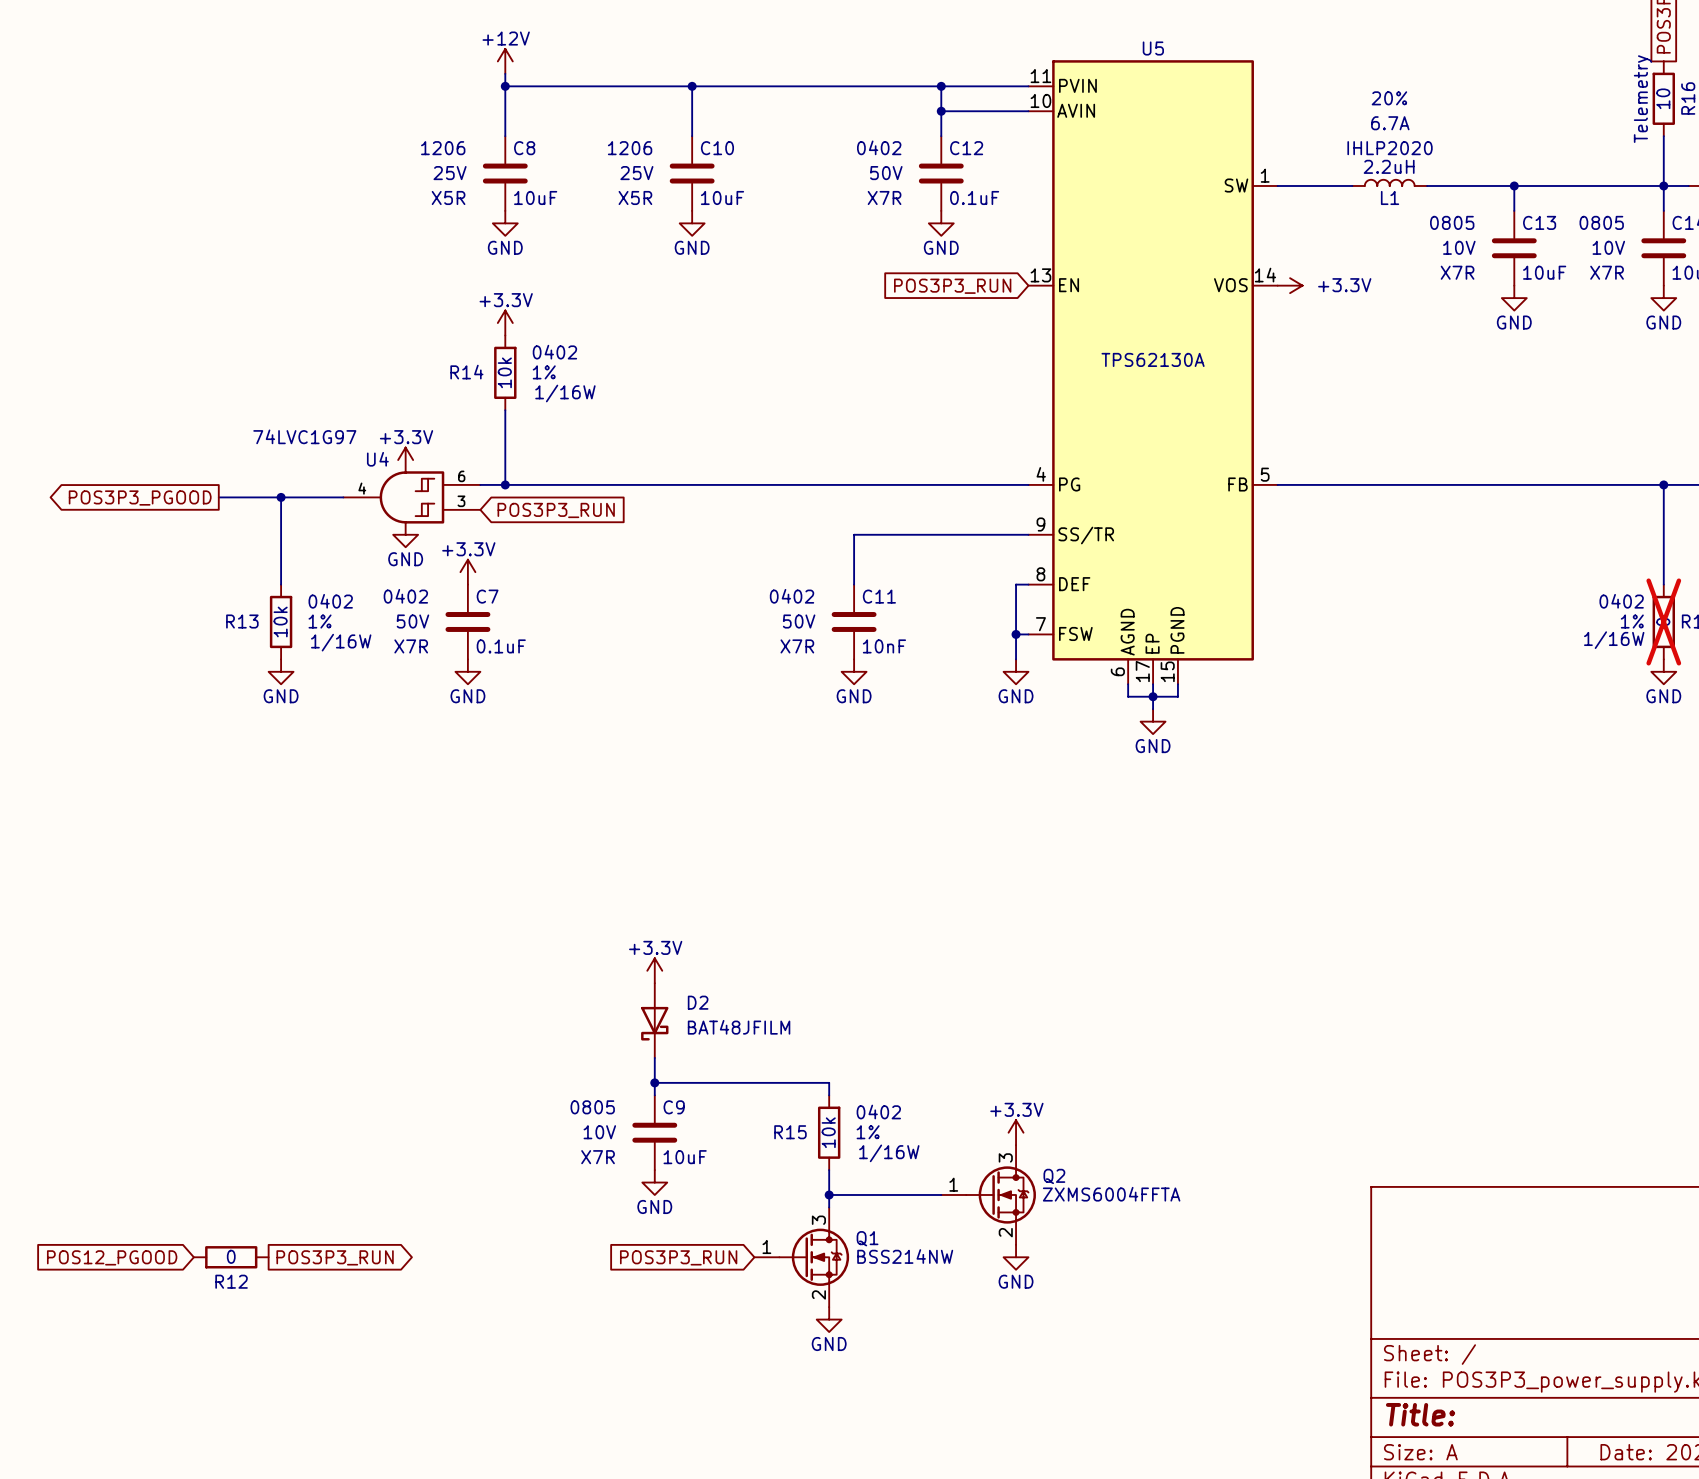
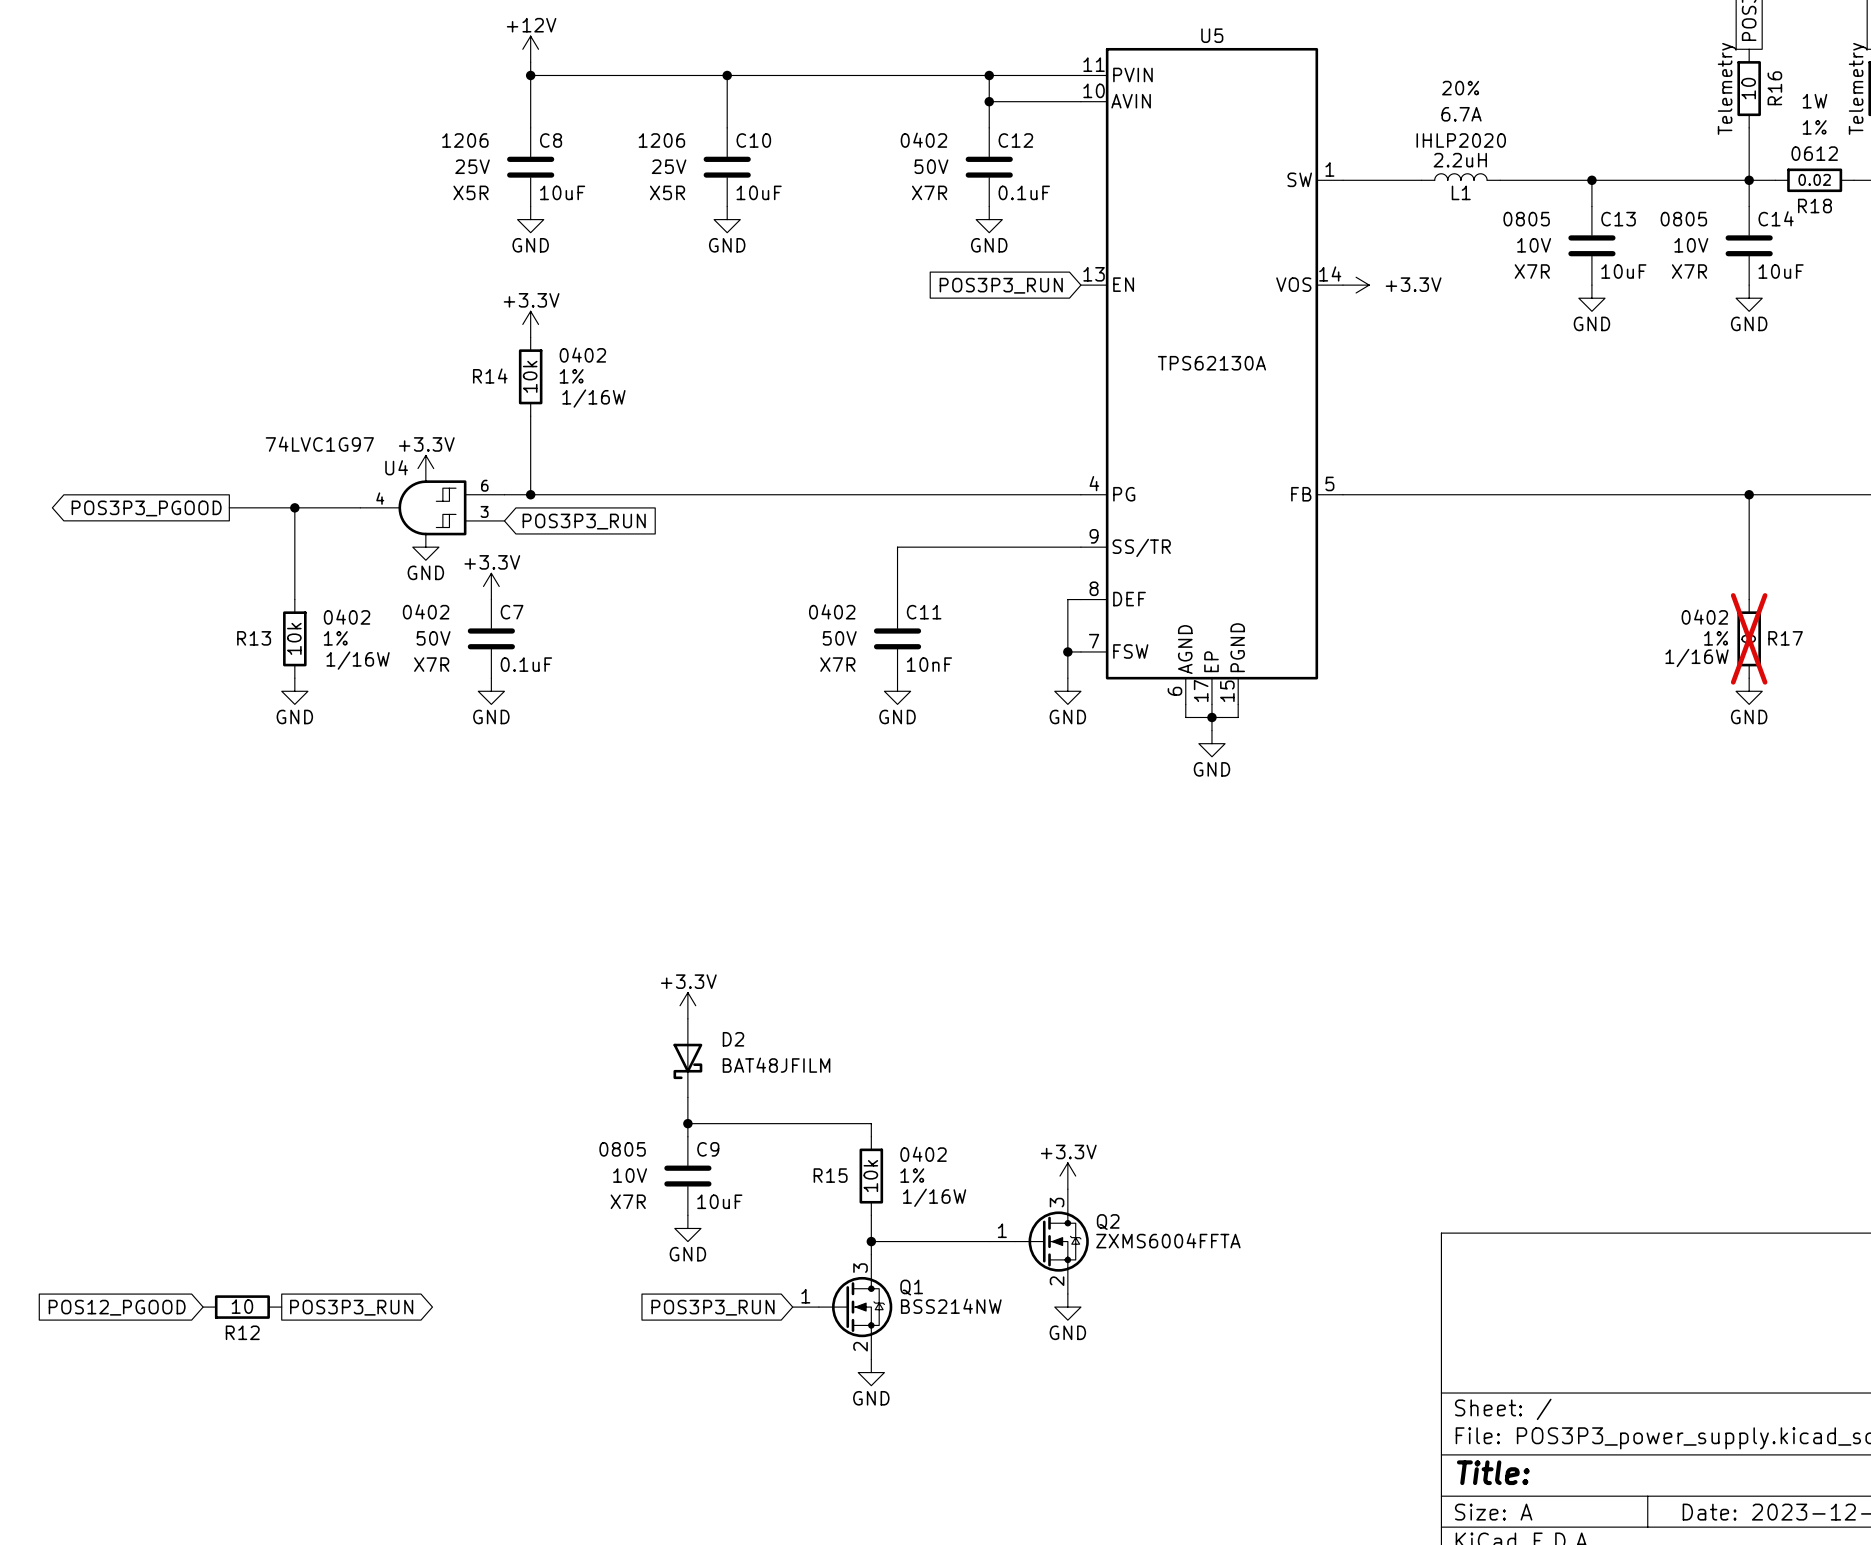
R12 value: 0 (231, 1256) -> 10 (242, 1306)

